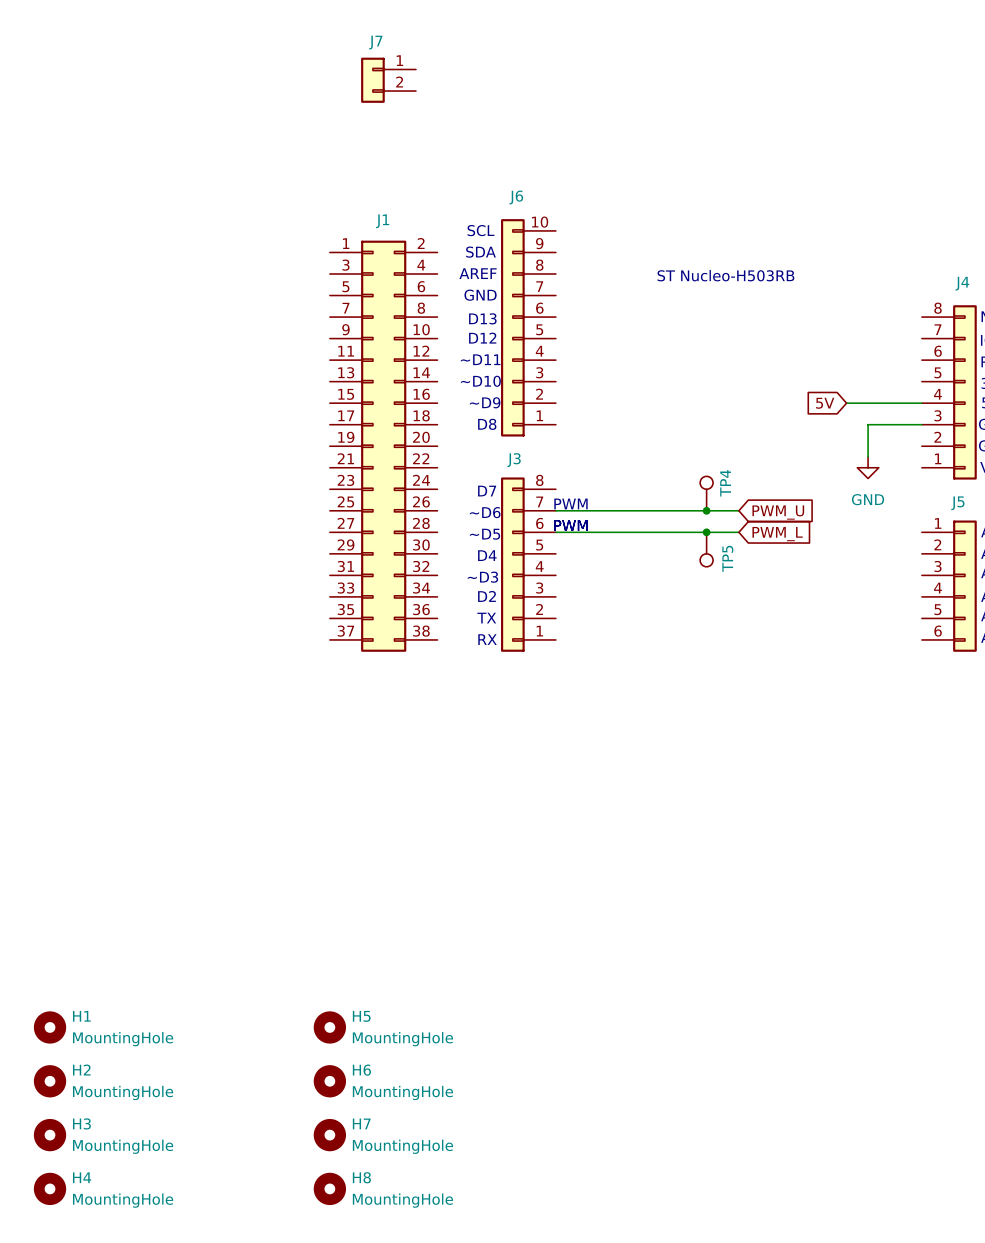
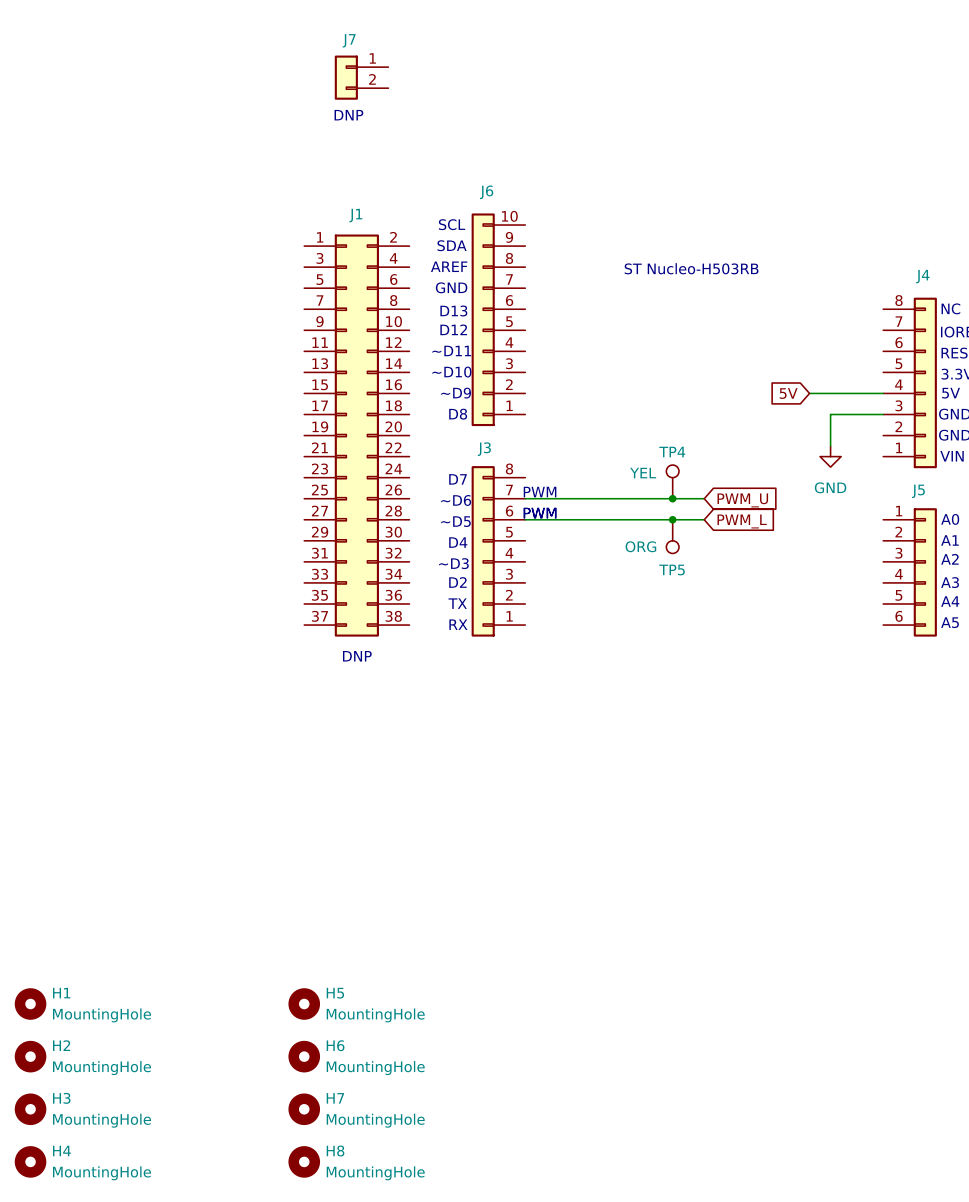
text: none -> DNP (348, 115)
TP4 name rotation: 0° (725, 483) -> 90° clockwise (672, 452)
TP4 value: none -> YEL (643, 473)
TP5 name rotation: 0° (727, 558) -> 90° clockwise (672, 570)
TP5 value: none -> ORG (640, 546)
text: none -> DNP (357, 656)

